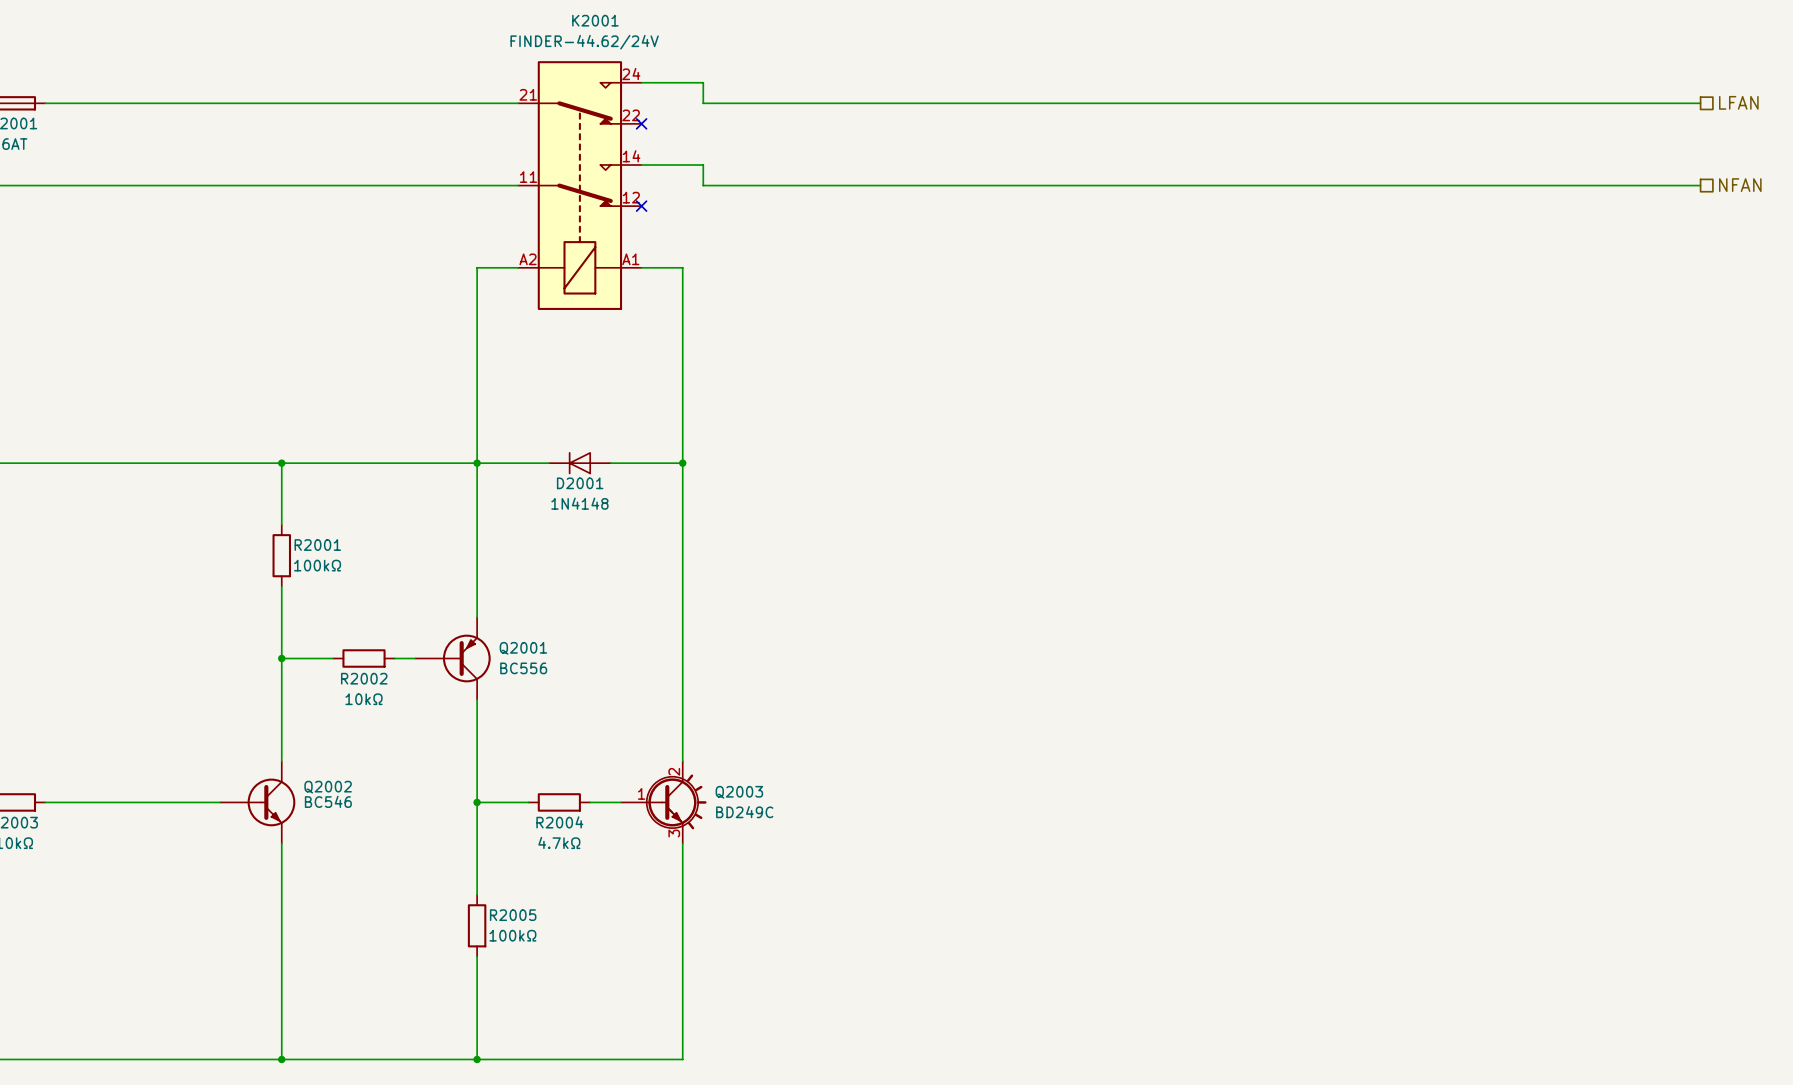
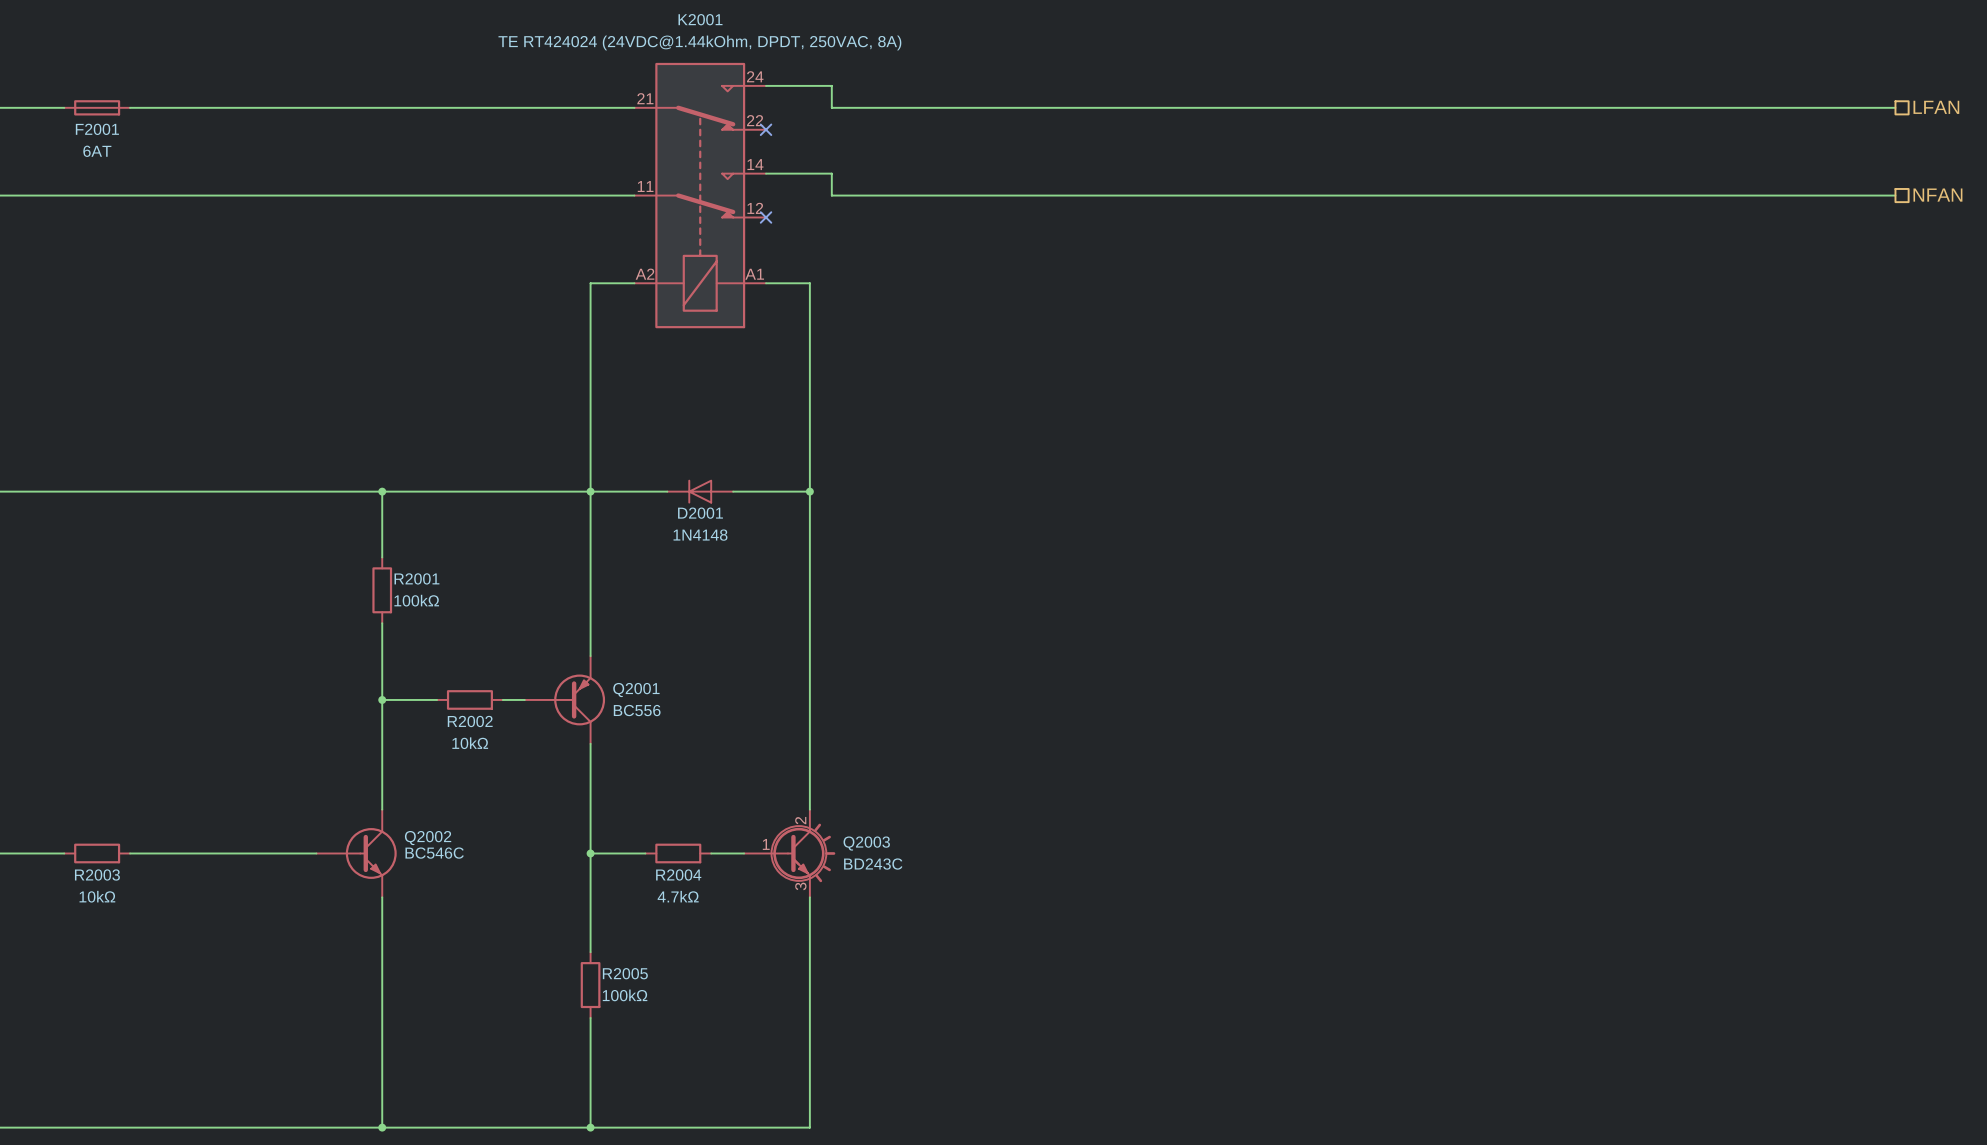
K2001 name position: K2001 (595, 20) -> K2001 (700, 19)
K2001 value: FINDER-44.62/24V (584, 42) -> TE RT424024 (24VDC@1.44kOhm, DPDT, 250VAC, 8A) (699, 42)
Q2002 value: BC546 (328, 801) -> BC546C (434, 853)
Q2003 value: BD249C (744, 812) -> BD243C (873, 864)

